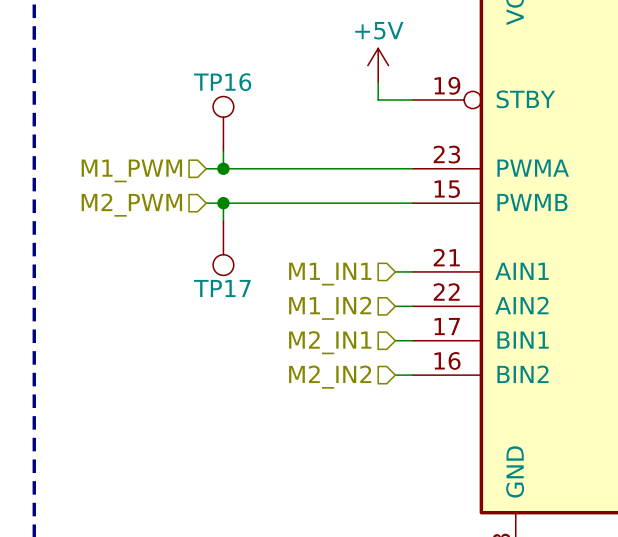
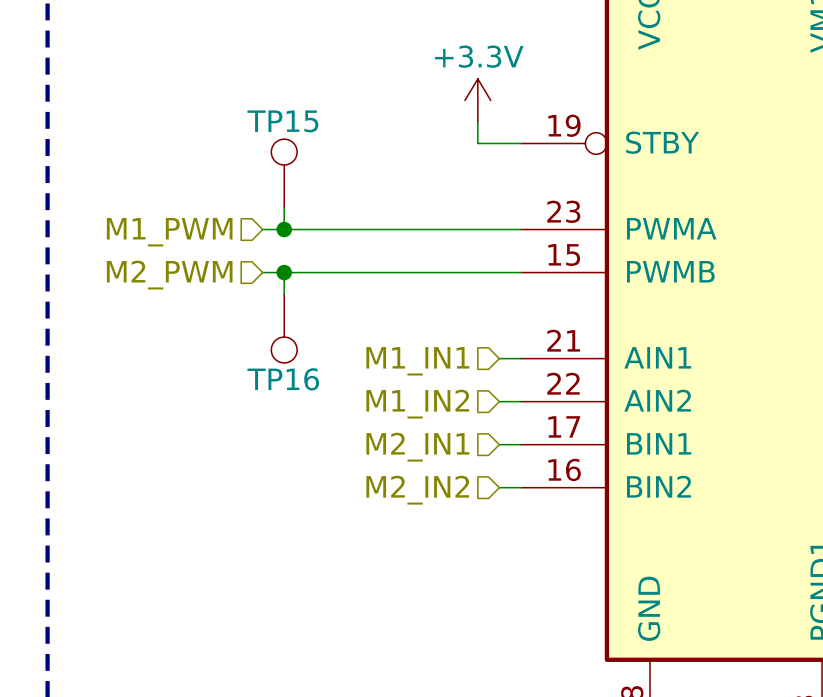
power symbol: +5V (378, 65) -> +3.3V (477, 100)
TP16 name: TP16 (222, 82) -> TP15 (282, 121)
TP17 name: TP17 (222, 288) -> TP16 (283, 379)

